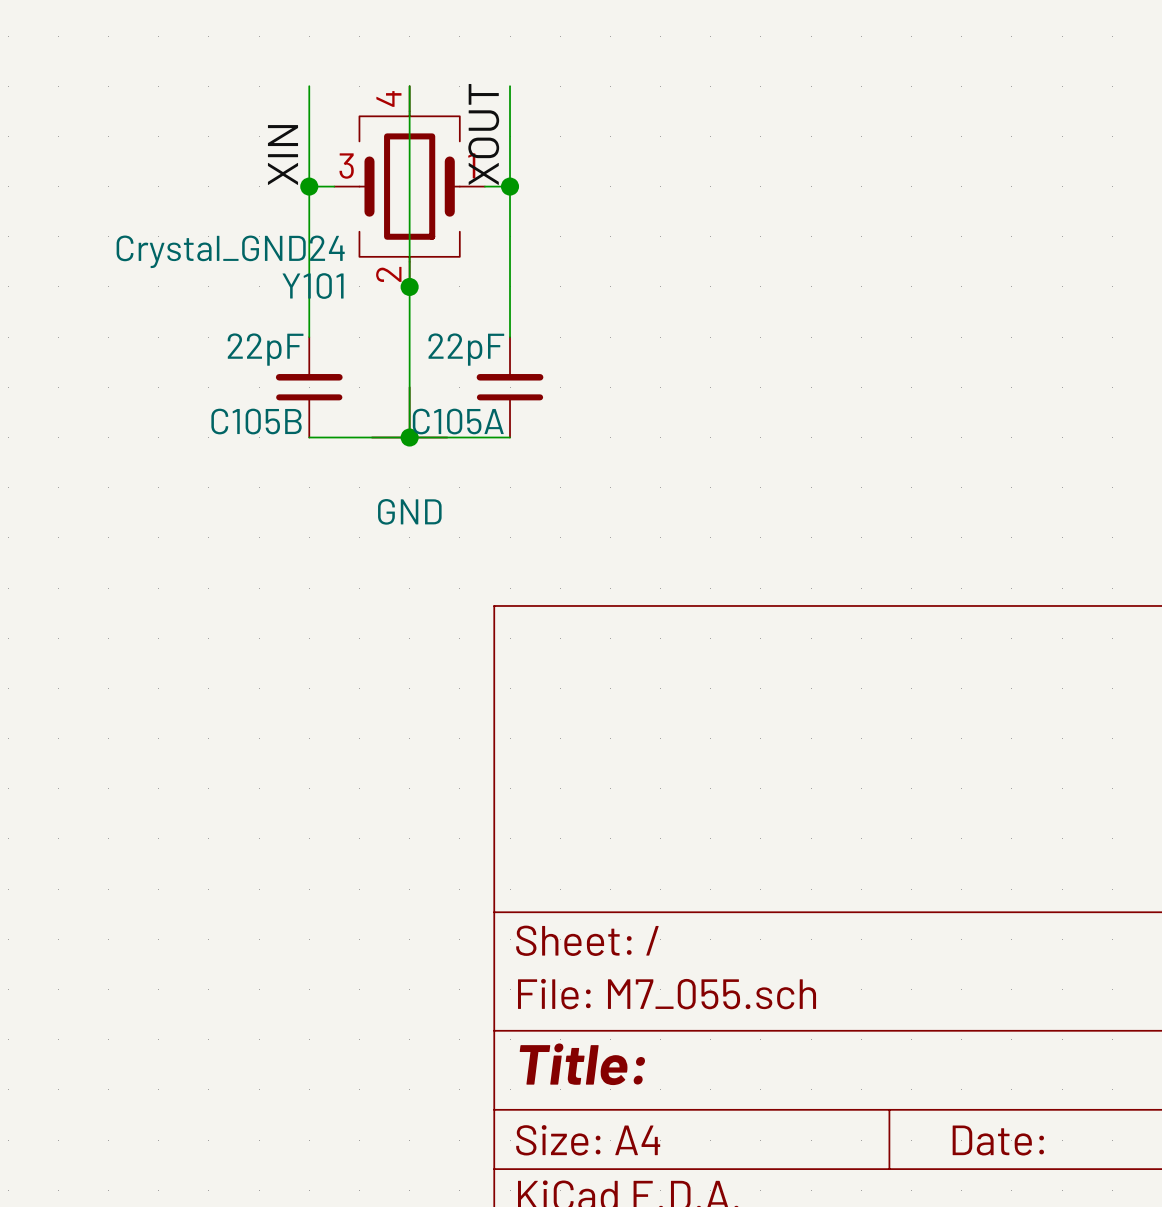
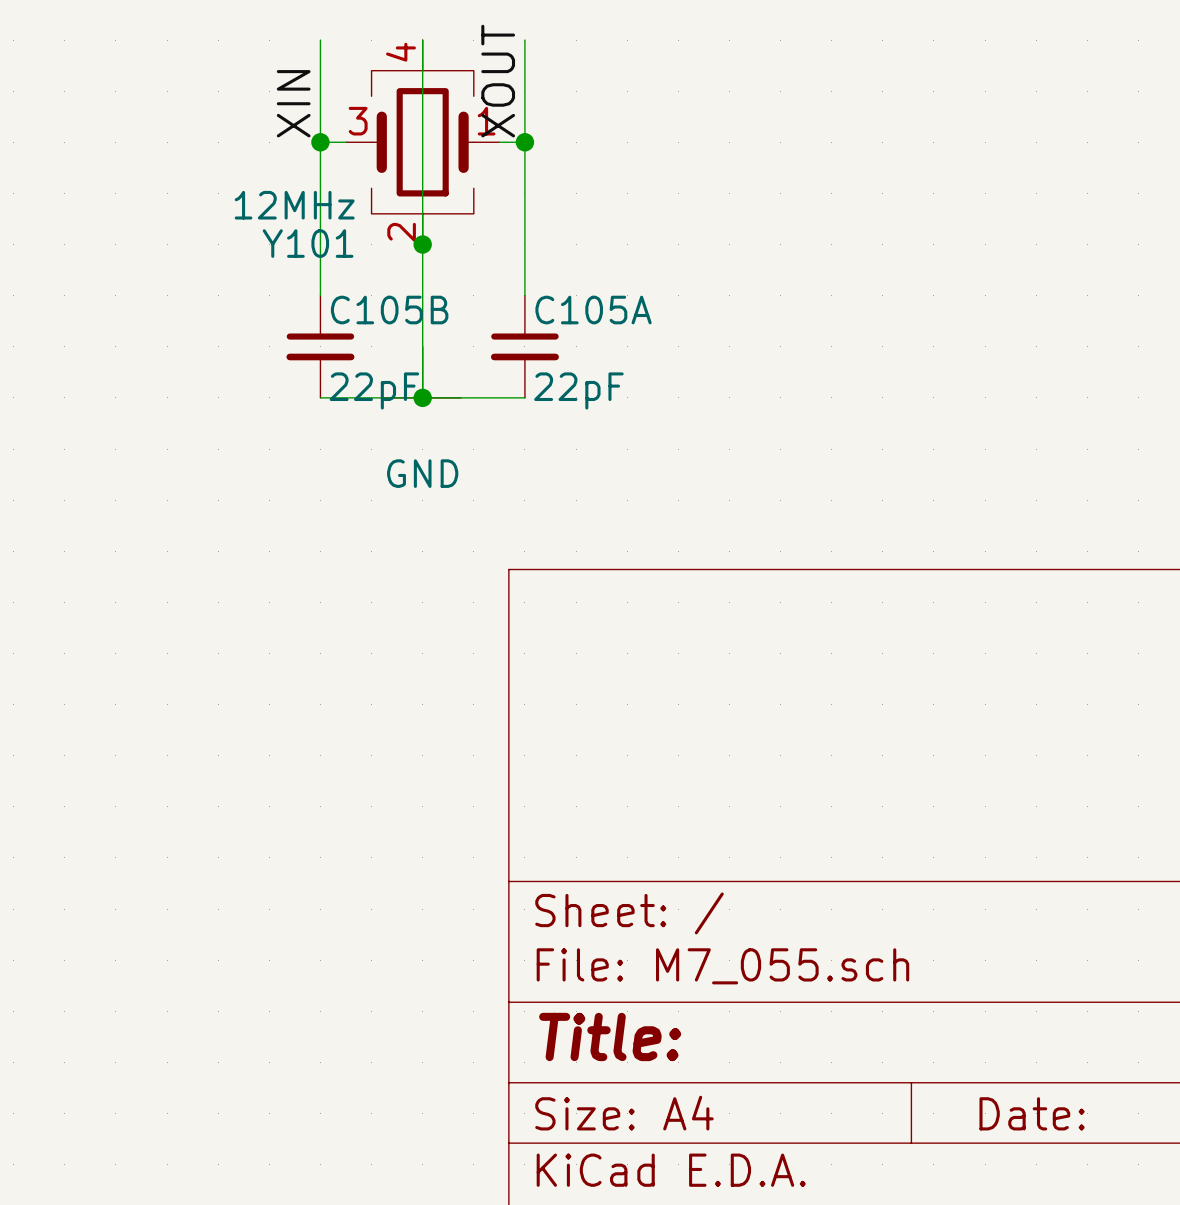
Y101 value: Crystal_GND24 (230, 251) -> 12MHz (294, 205)
C105B rotation: 0° (309, 387) -> 180° (320, 346)
C105A rotation: 0° (510, 387) -> 180° (524, 346)

